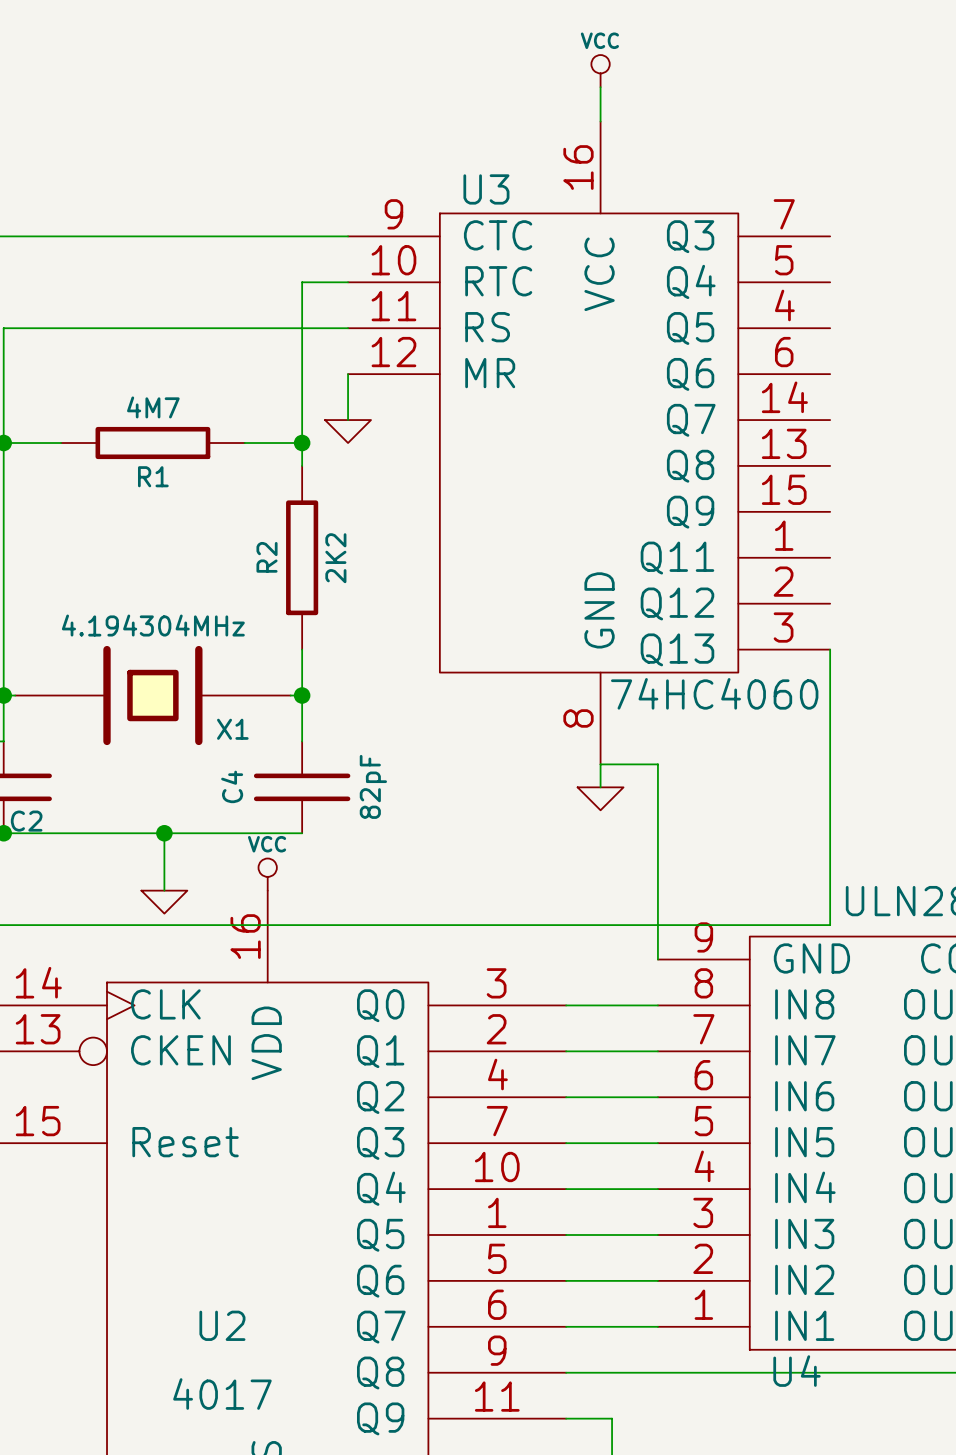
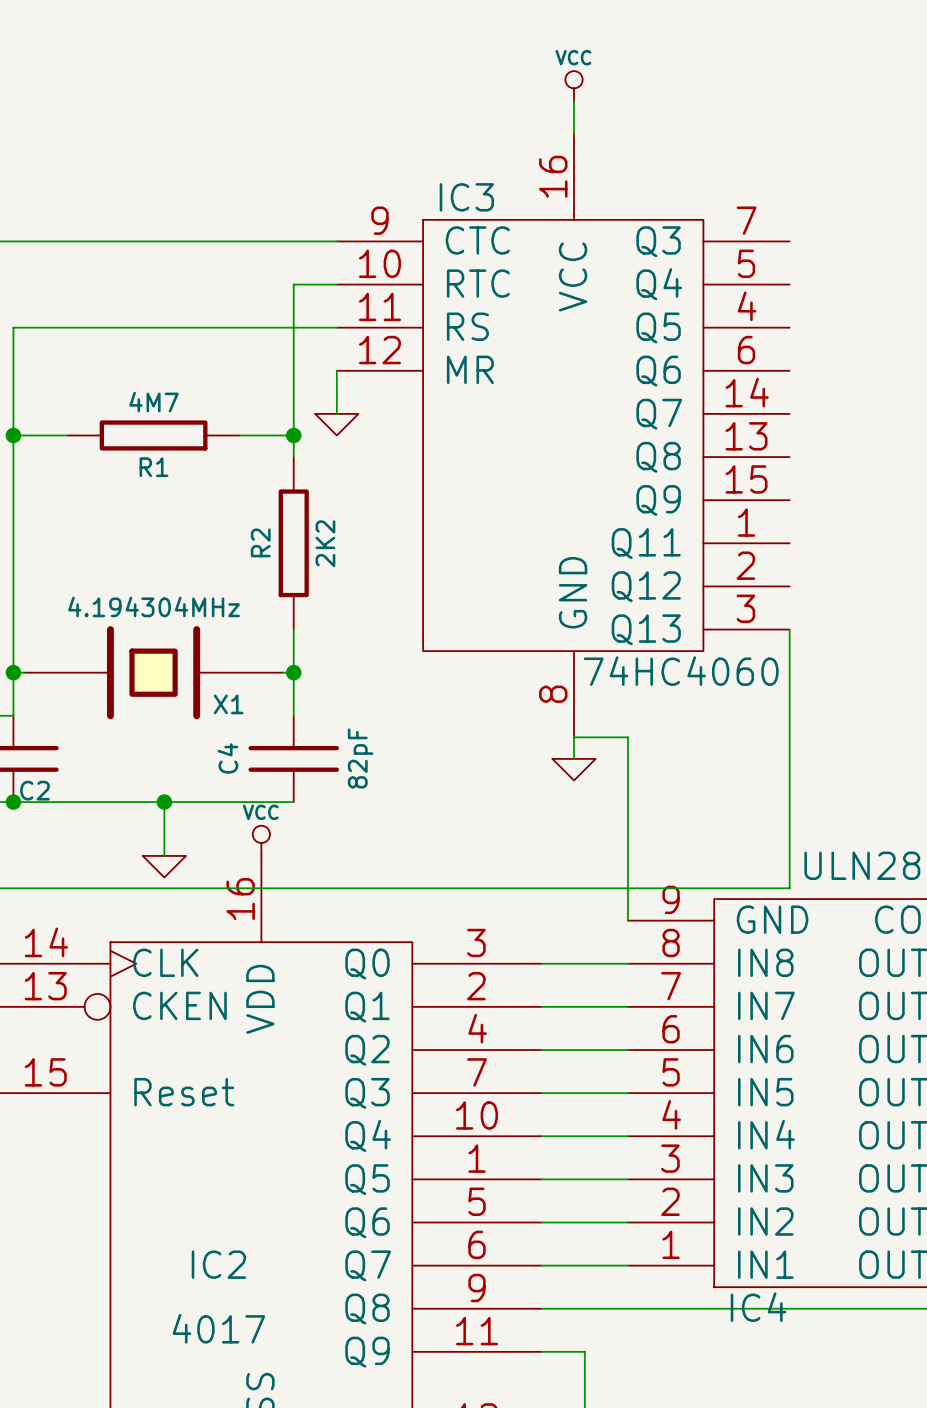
U3 name: U3 (486, 189) -> IC3 (466, 197)
U2 name: U2 (222, 1325) -> IC2 (218, 1264)
U4 name: U4 (797, 1371) -> IC4 (758, 1307)

